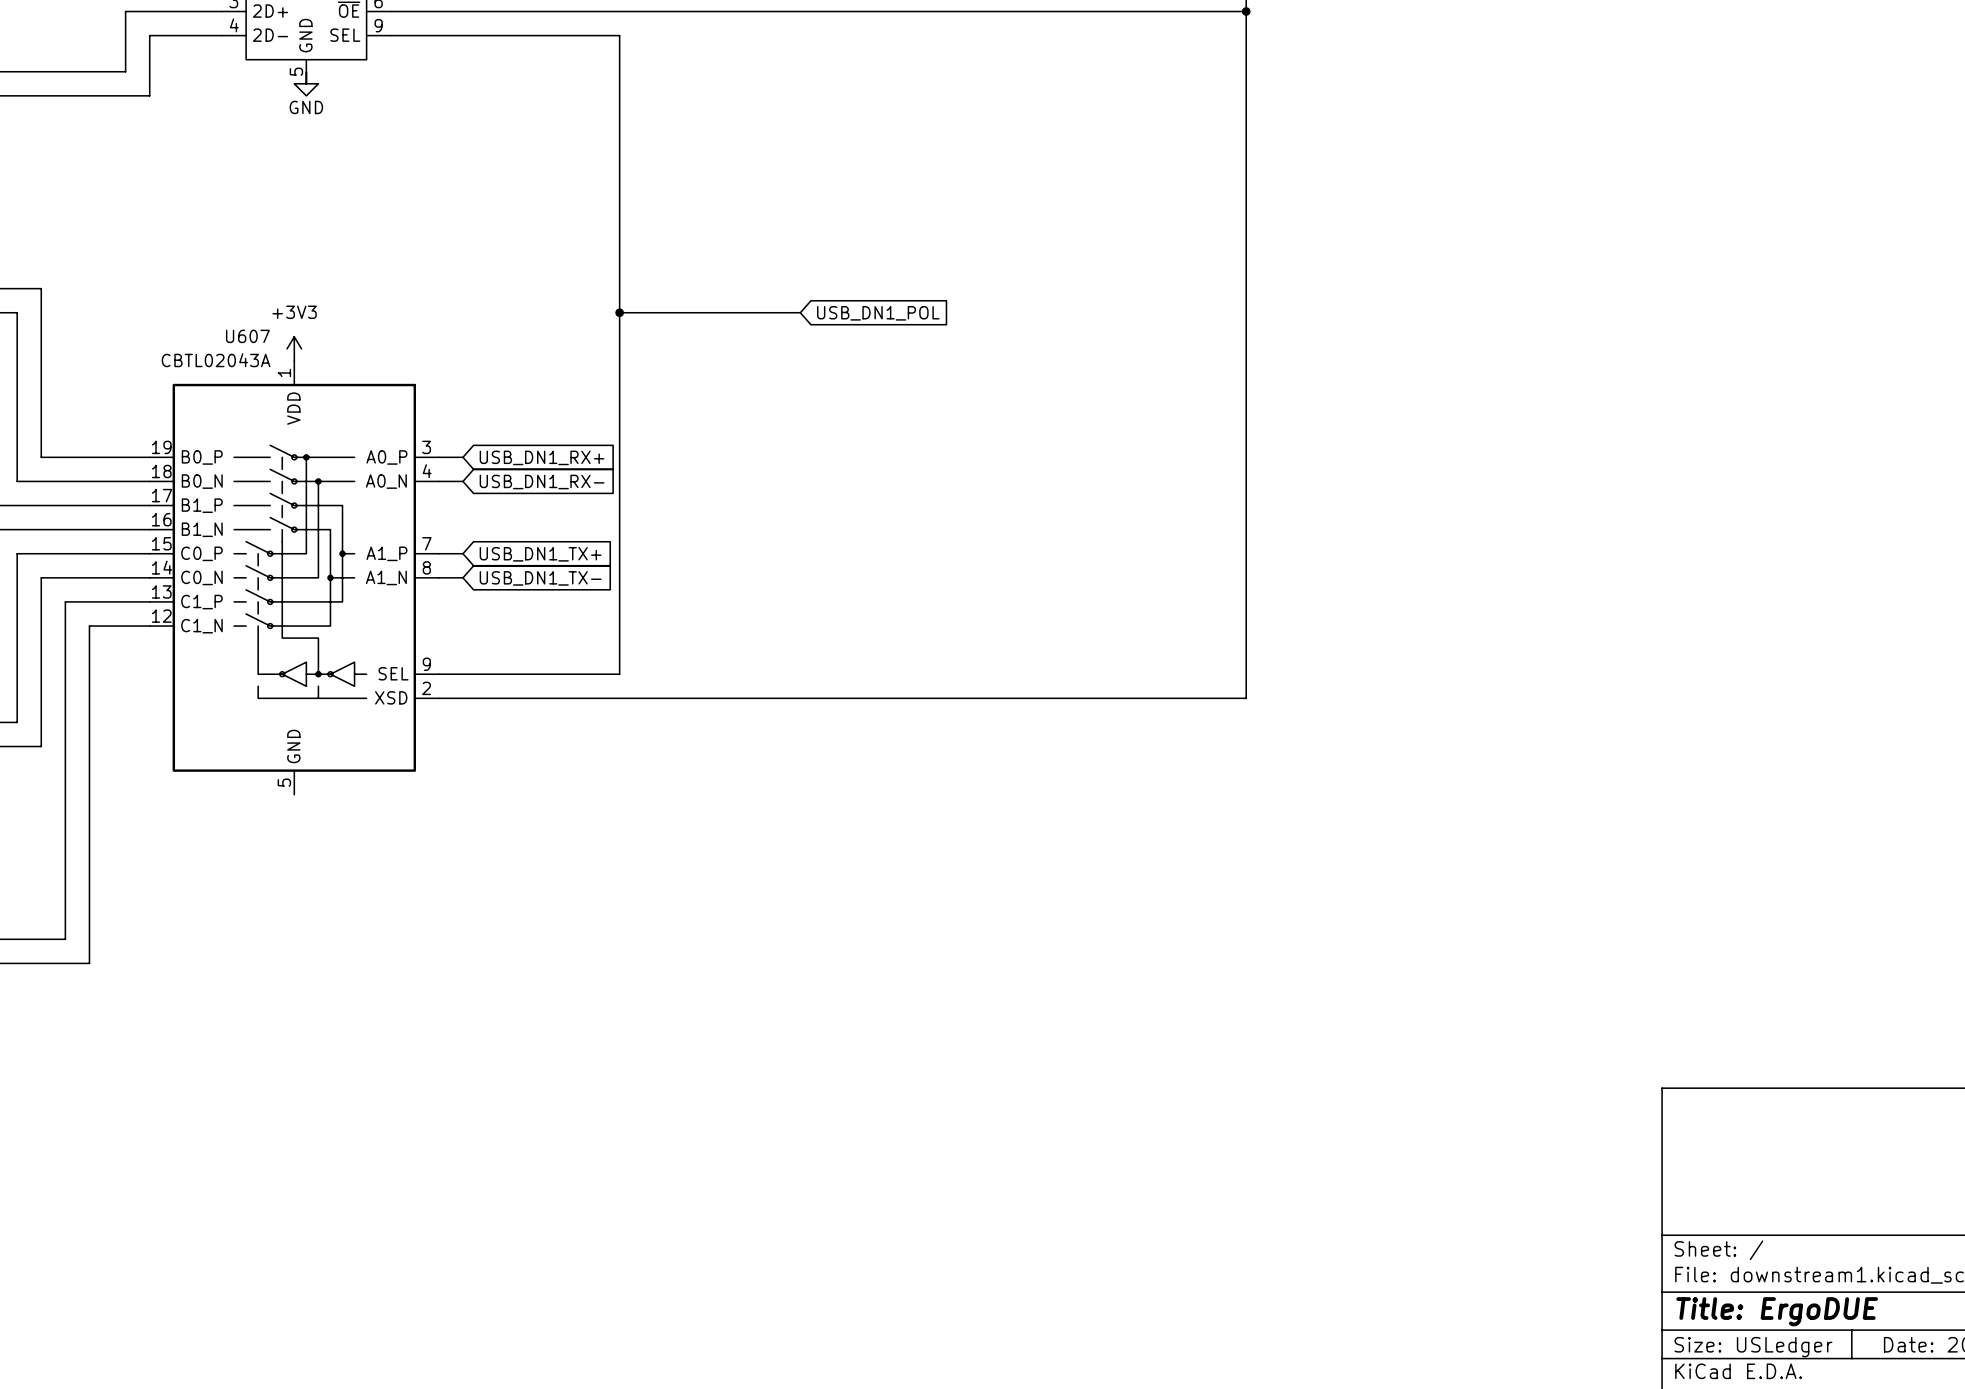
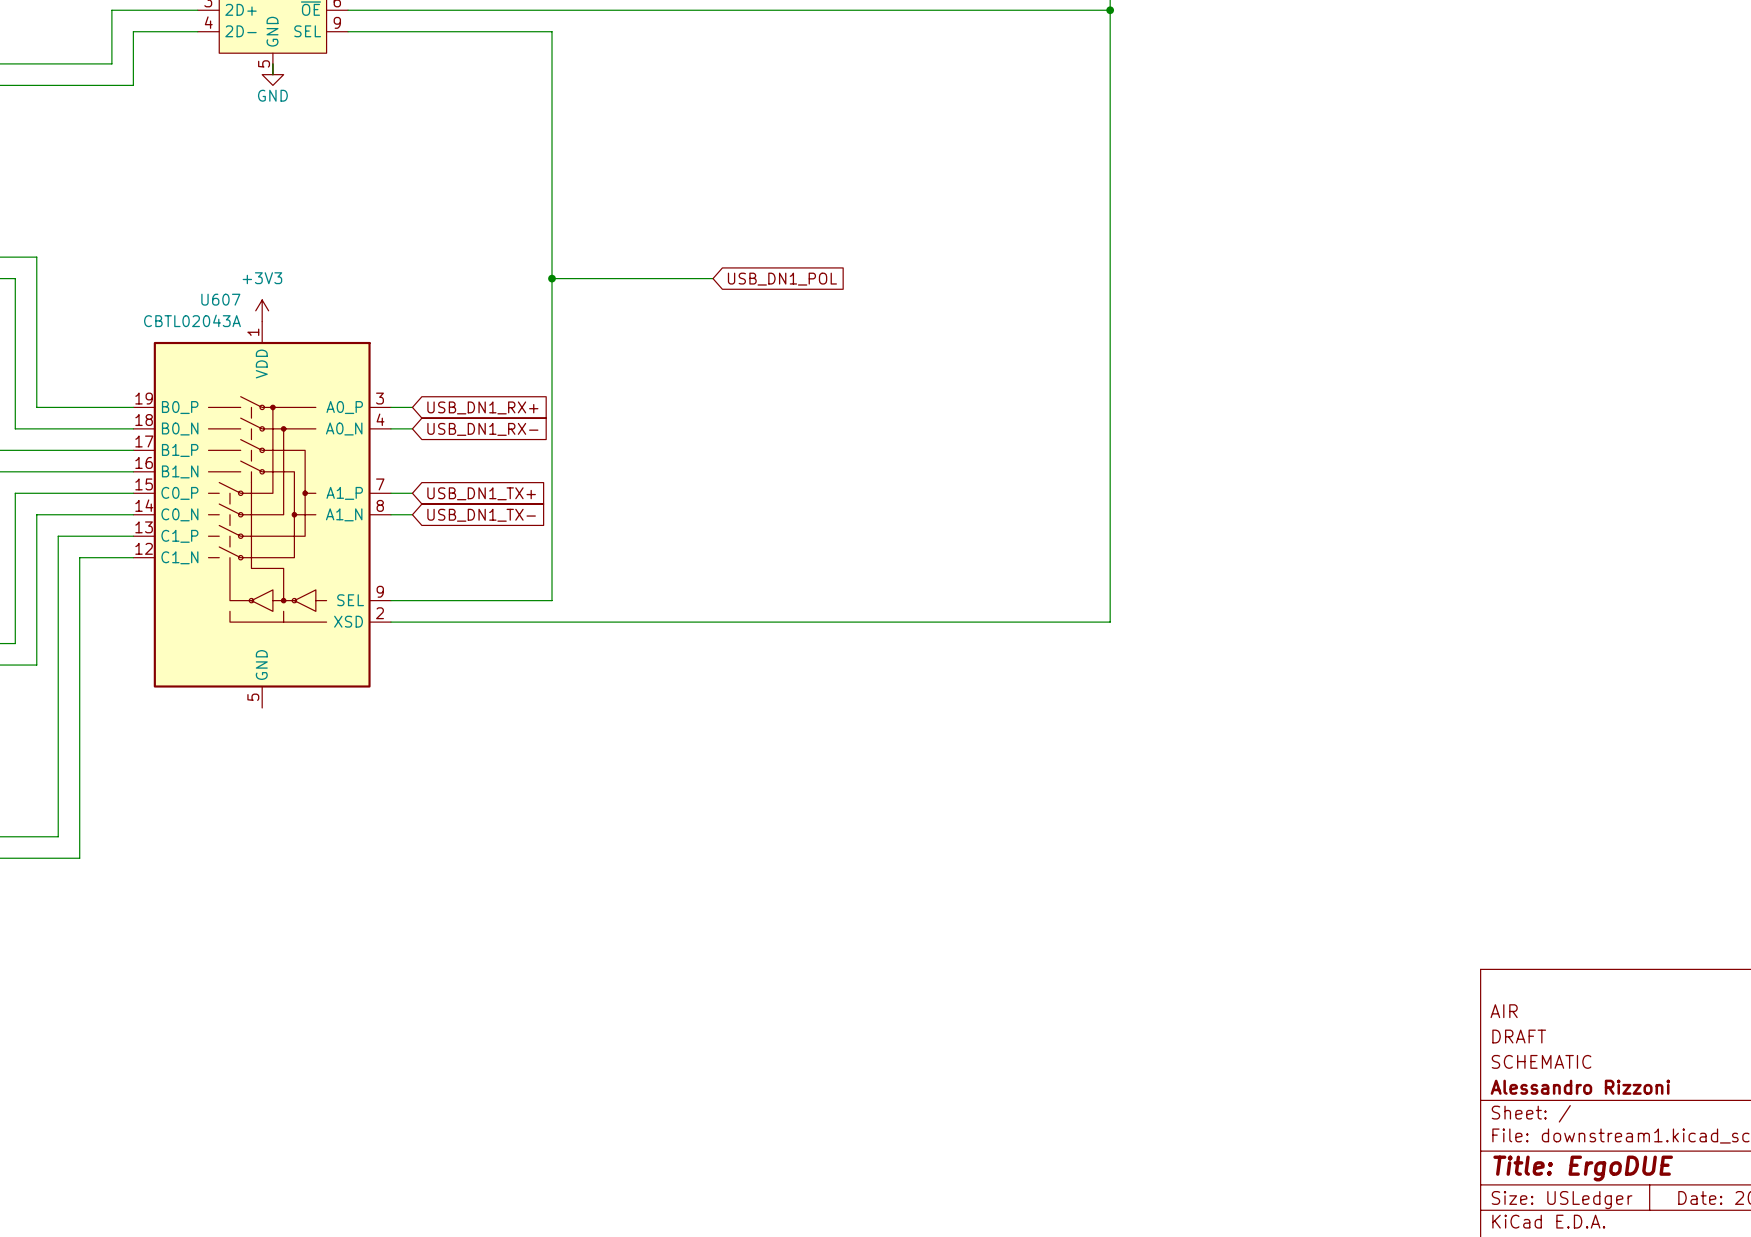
title block: none -> AIR (1504, 1011)
title block: none -> DRAFT (1519, 1036)
title block: none -> SCHEMATIC (1541, 1061)
title block: none -> Alessandro Rizzoni (1580, 1087)

